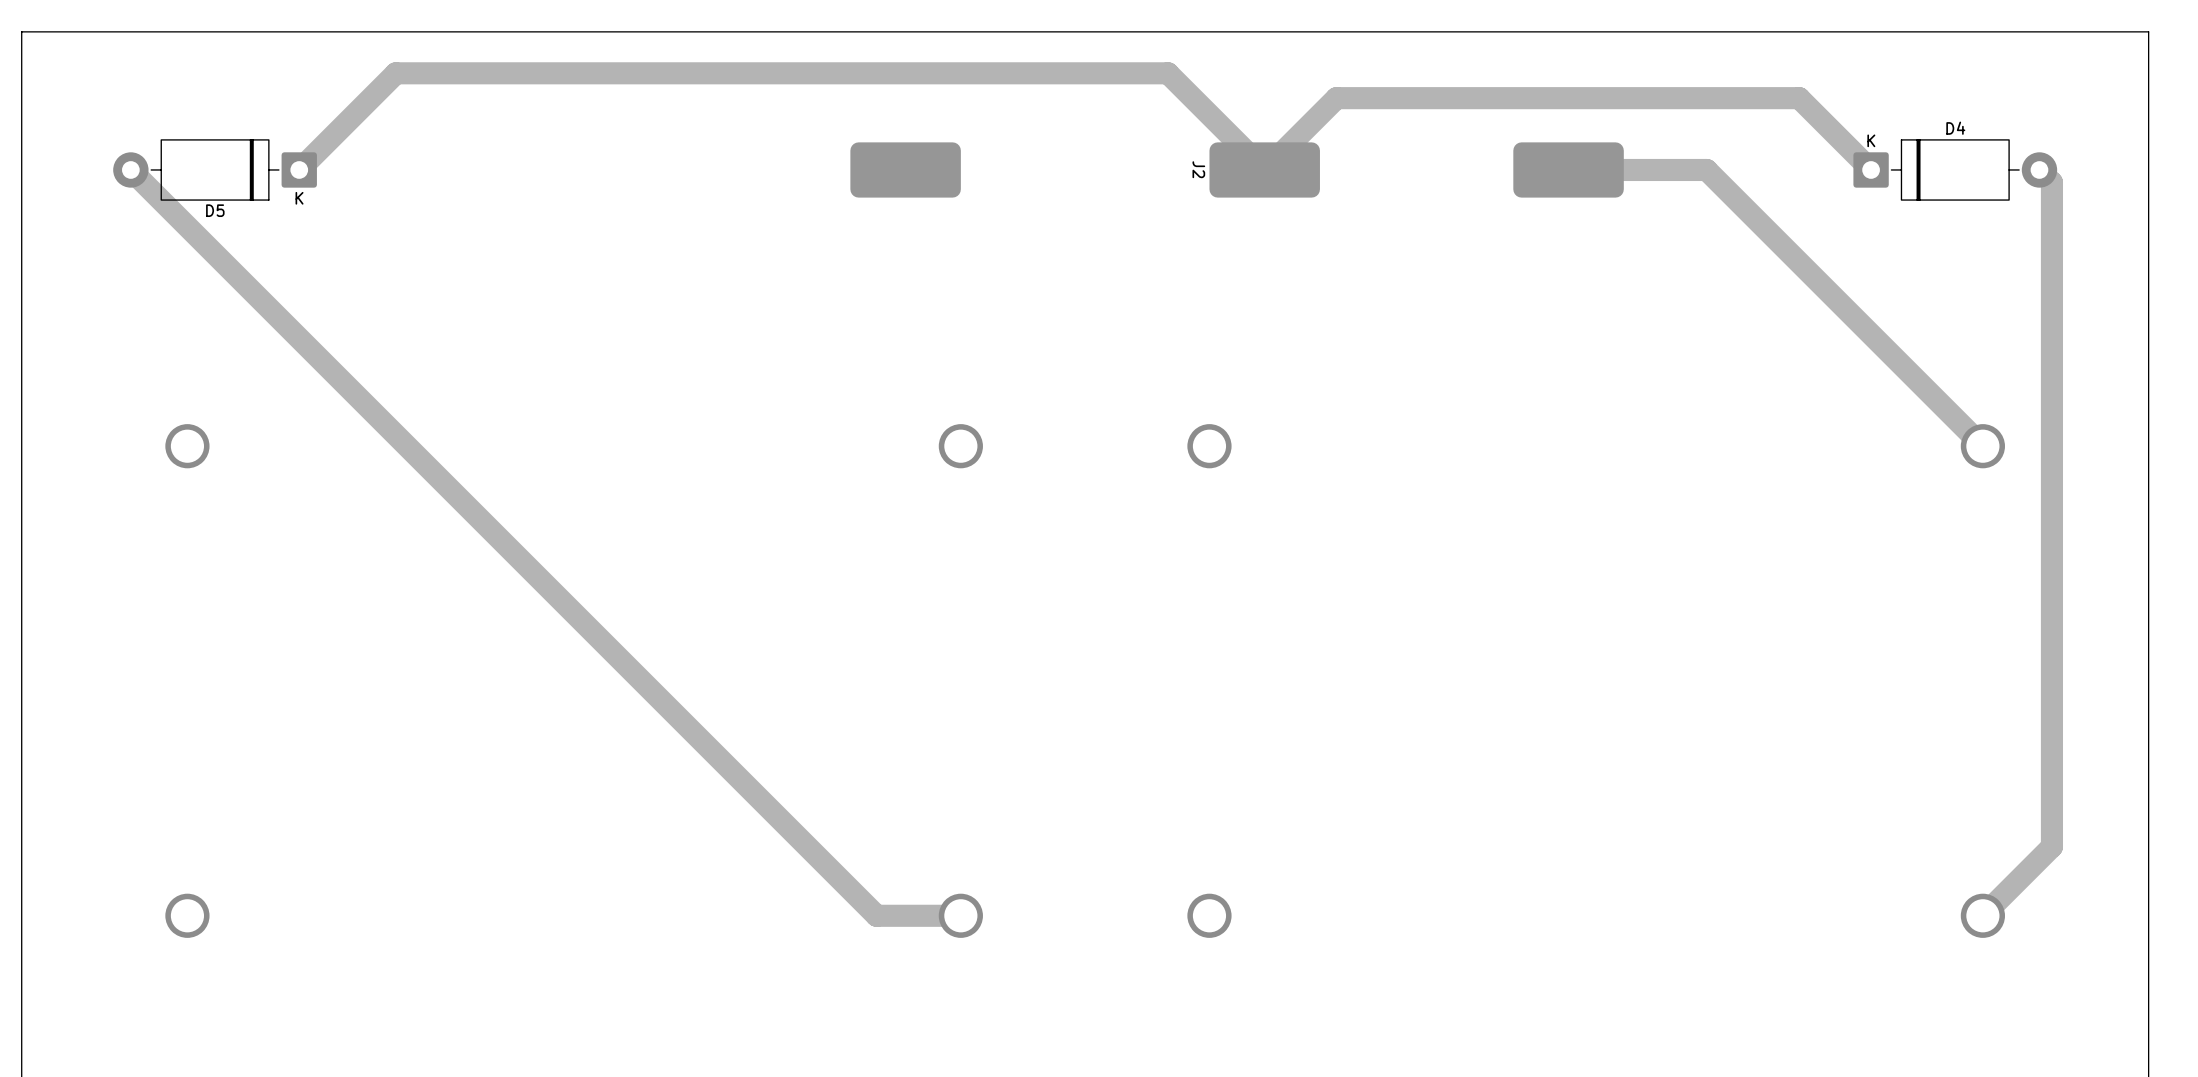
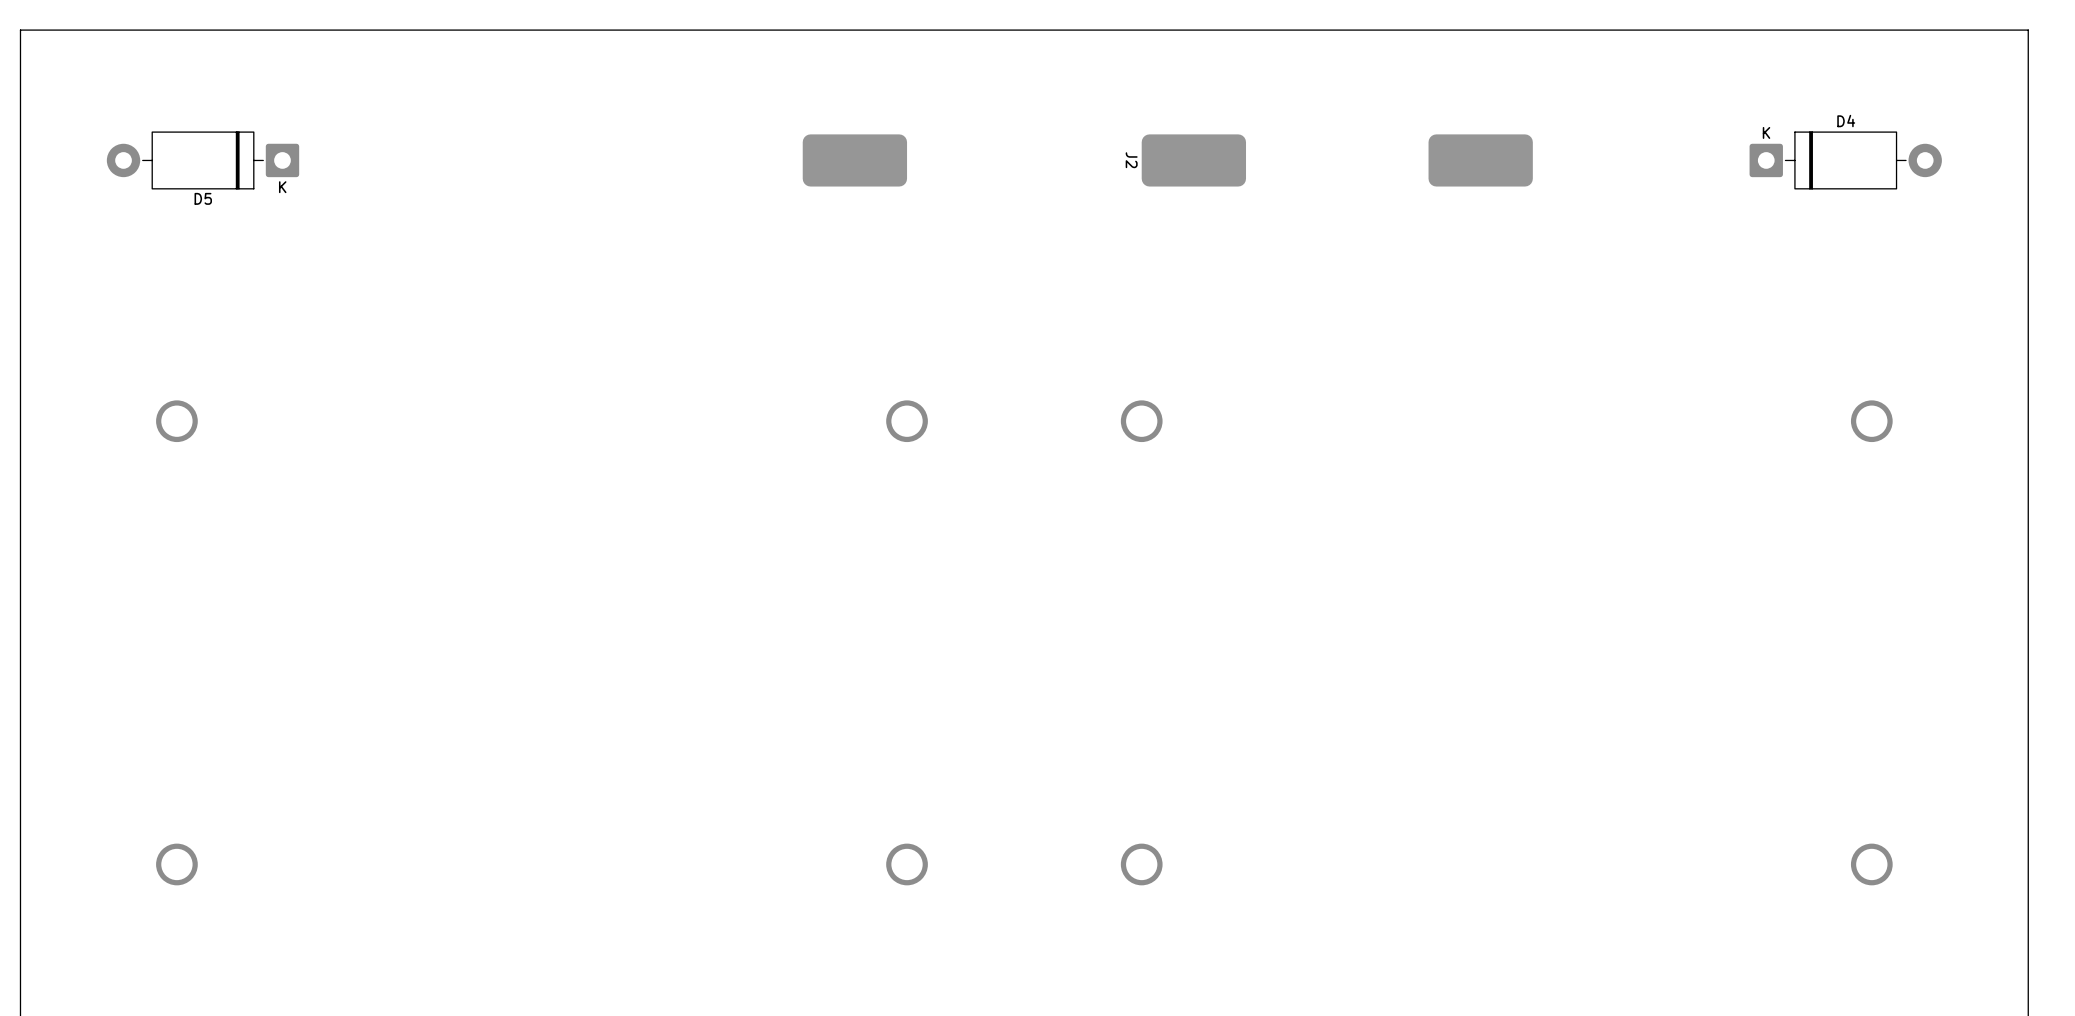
track: (130, 169) (876, 915) (960, 915) -> none
track: (1568, 169) (1706, 169) (1982, 446) -> none
track: (1871, 169) (1799, 98) (1336, 98) (1264, 169) (1168, 73) (395, 73) (299, 169) -> none
track: (2039, 169) (2051, 182) (2051, 846) (1982, 915) -> none

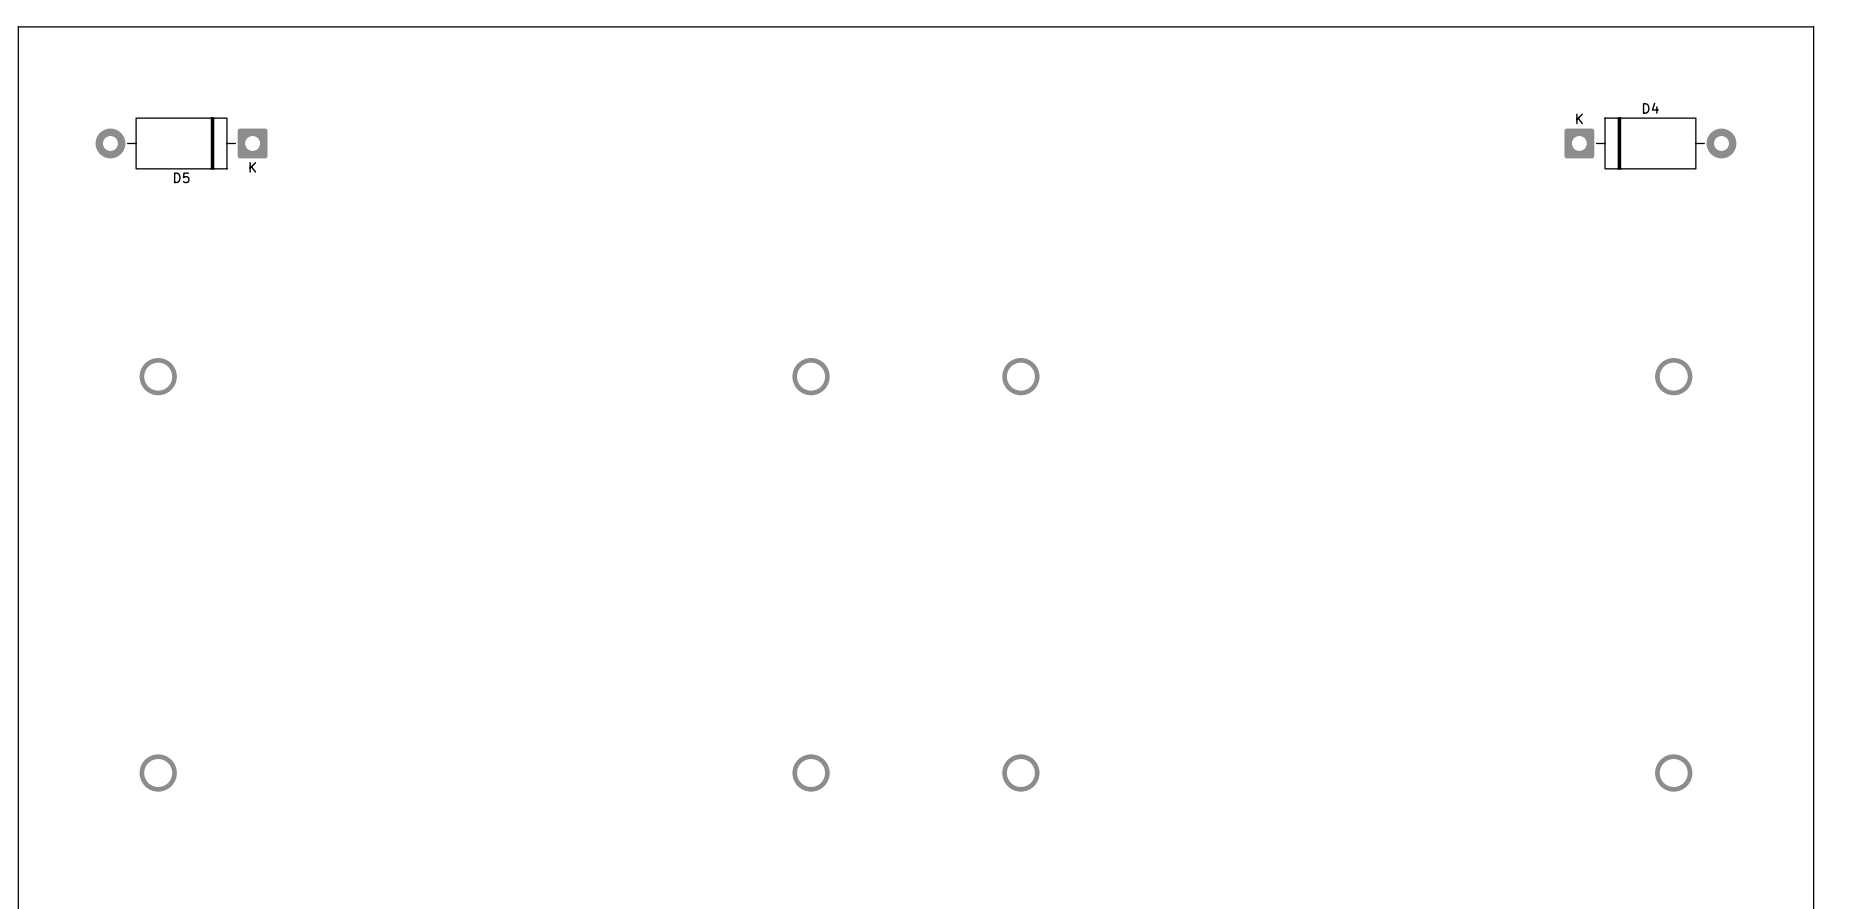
part: (854, 160) -> none
J2: (1193, 160) -> none
part: (1480, 160) -> none

